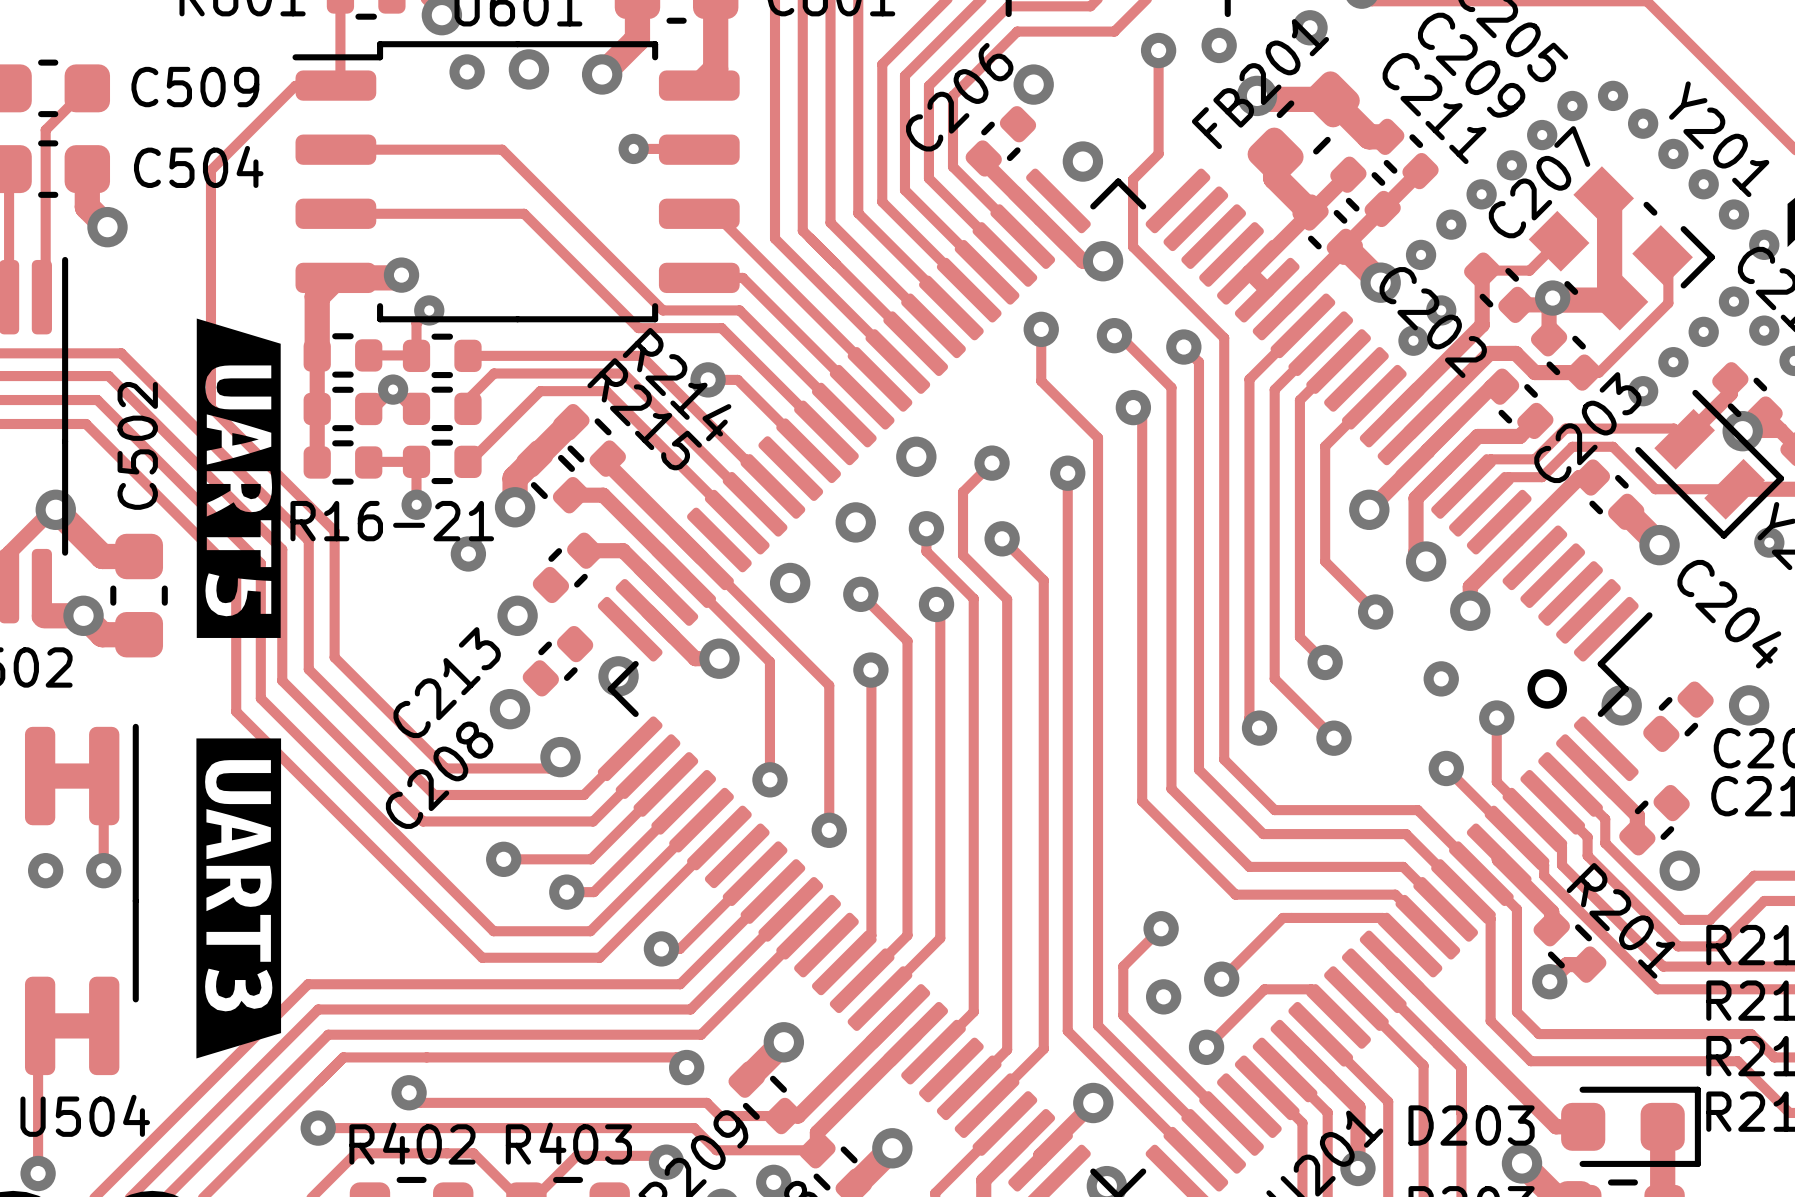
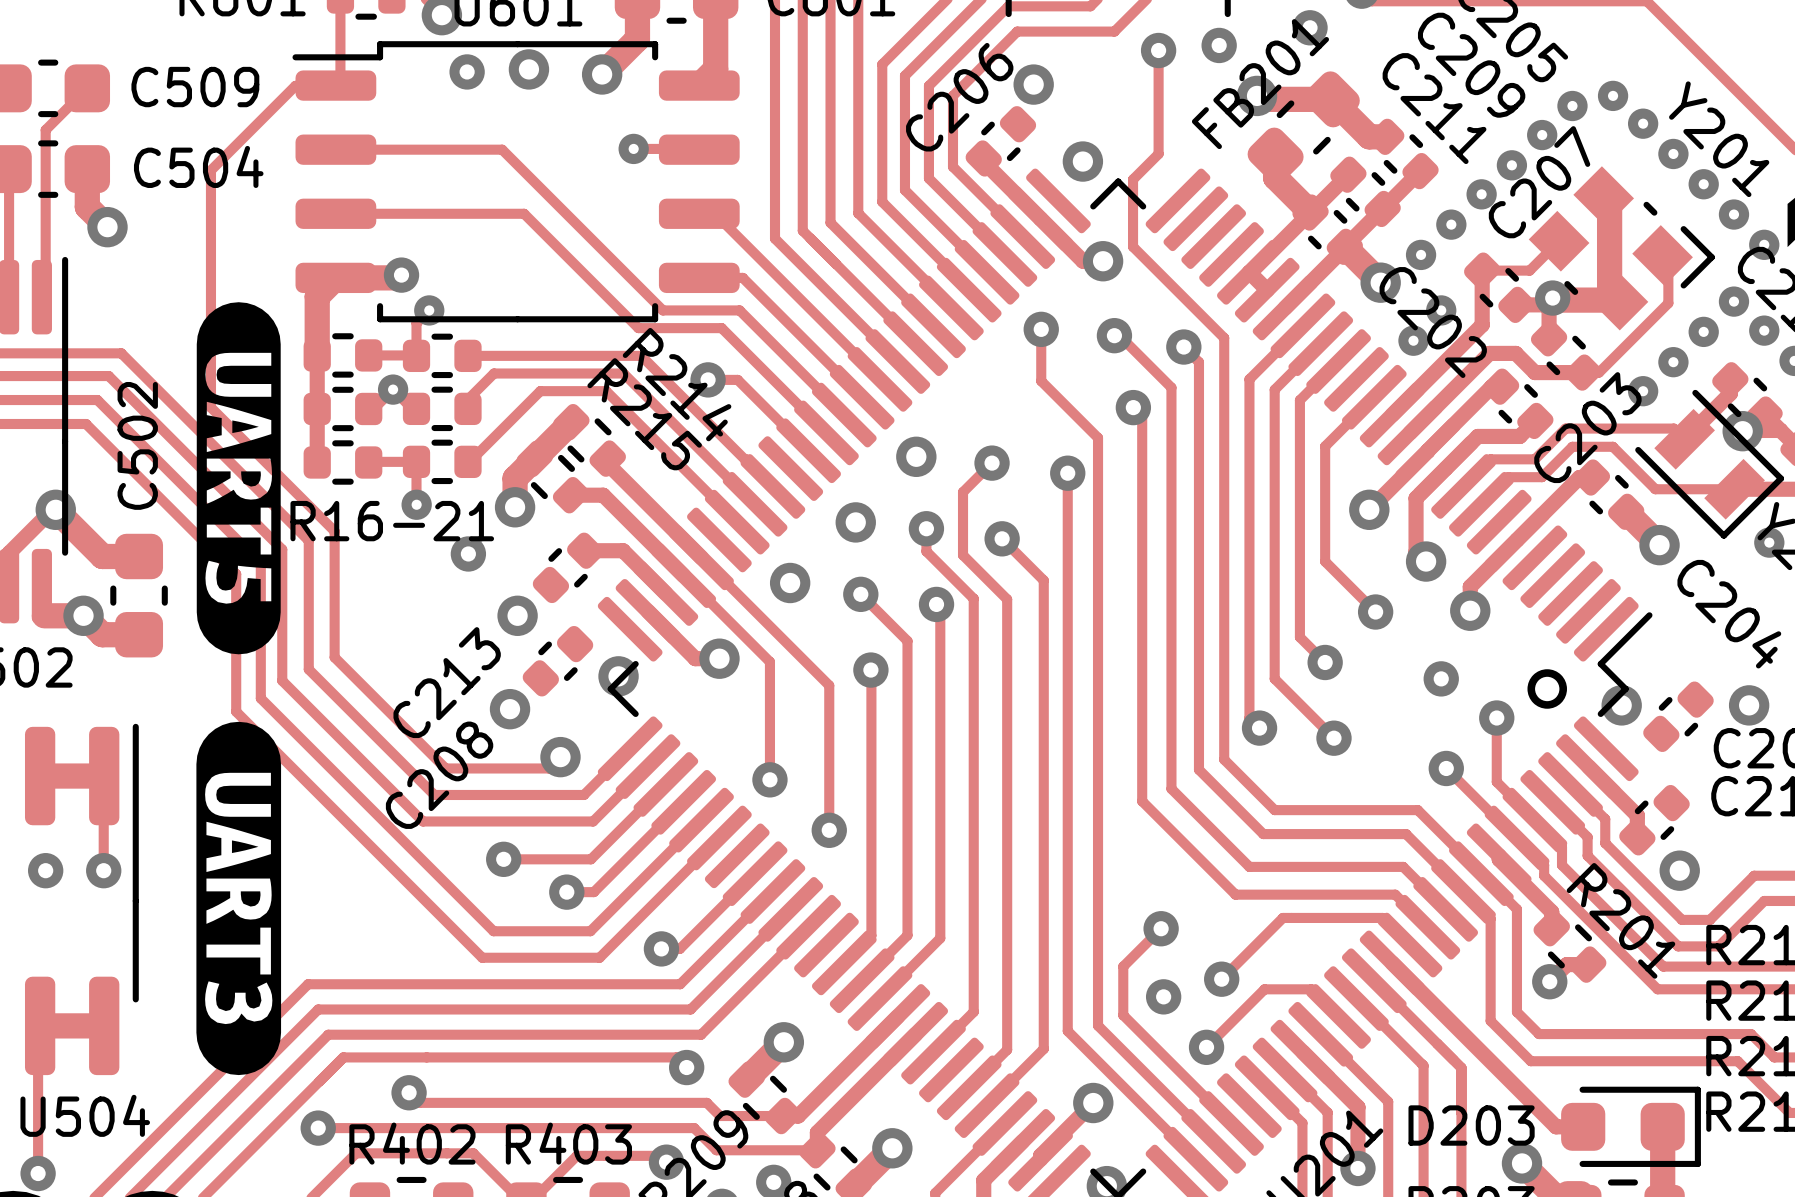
drawing shape: [196, 318, 281, 638] -> [196, 302, 281, 655]
drawing shape: [196, 738, 282, 1059] -> [196, 721, 282, 1076]

